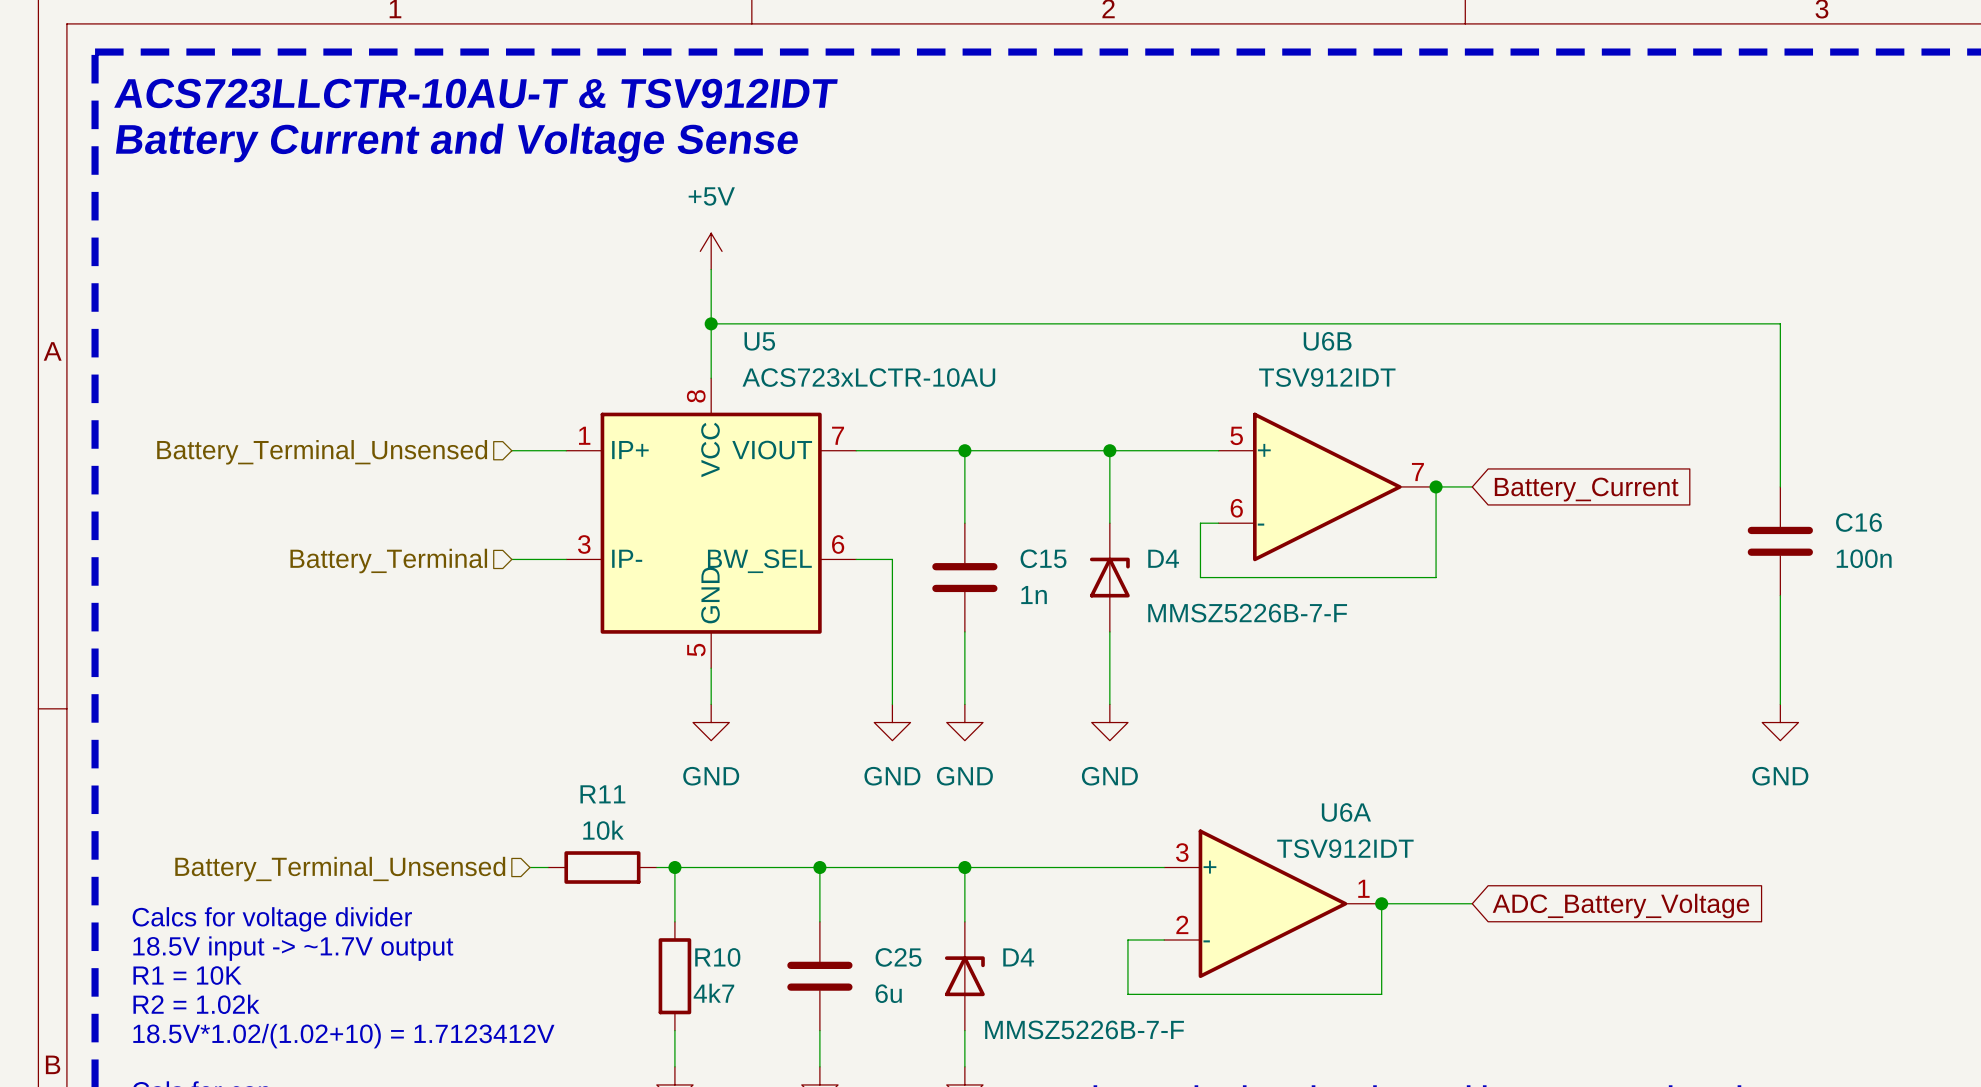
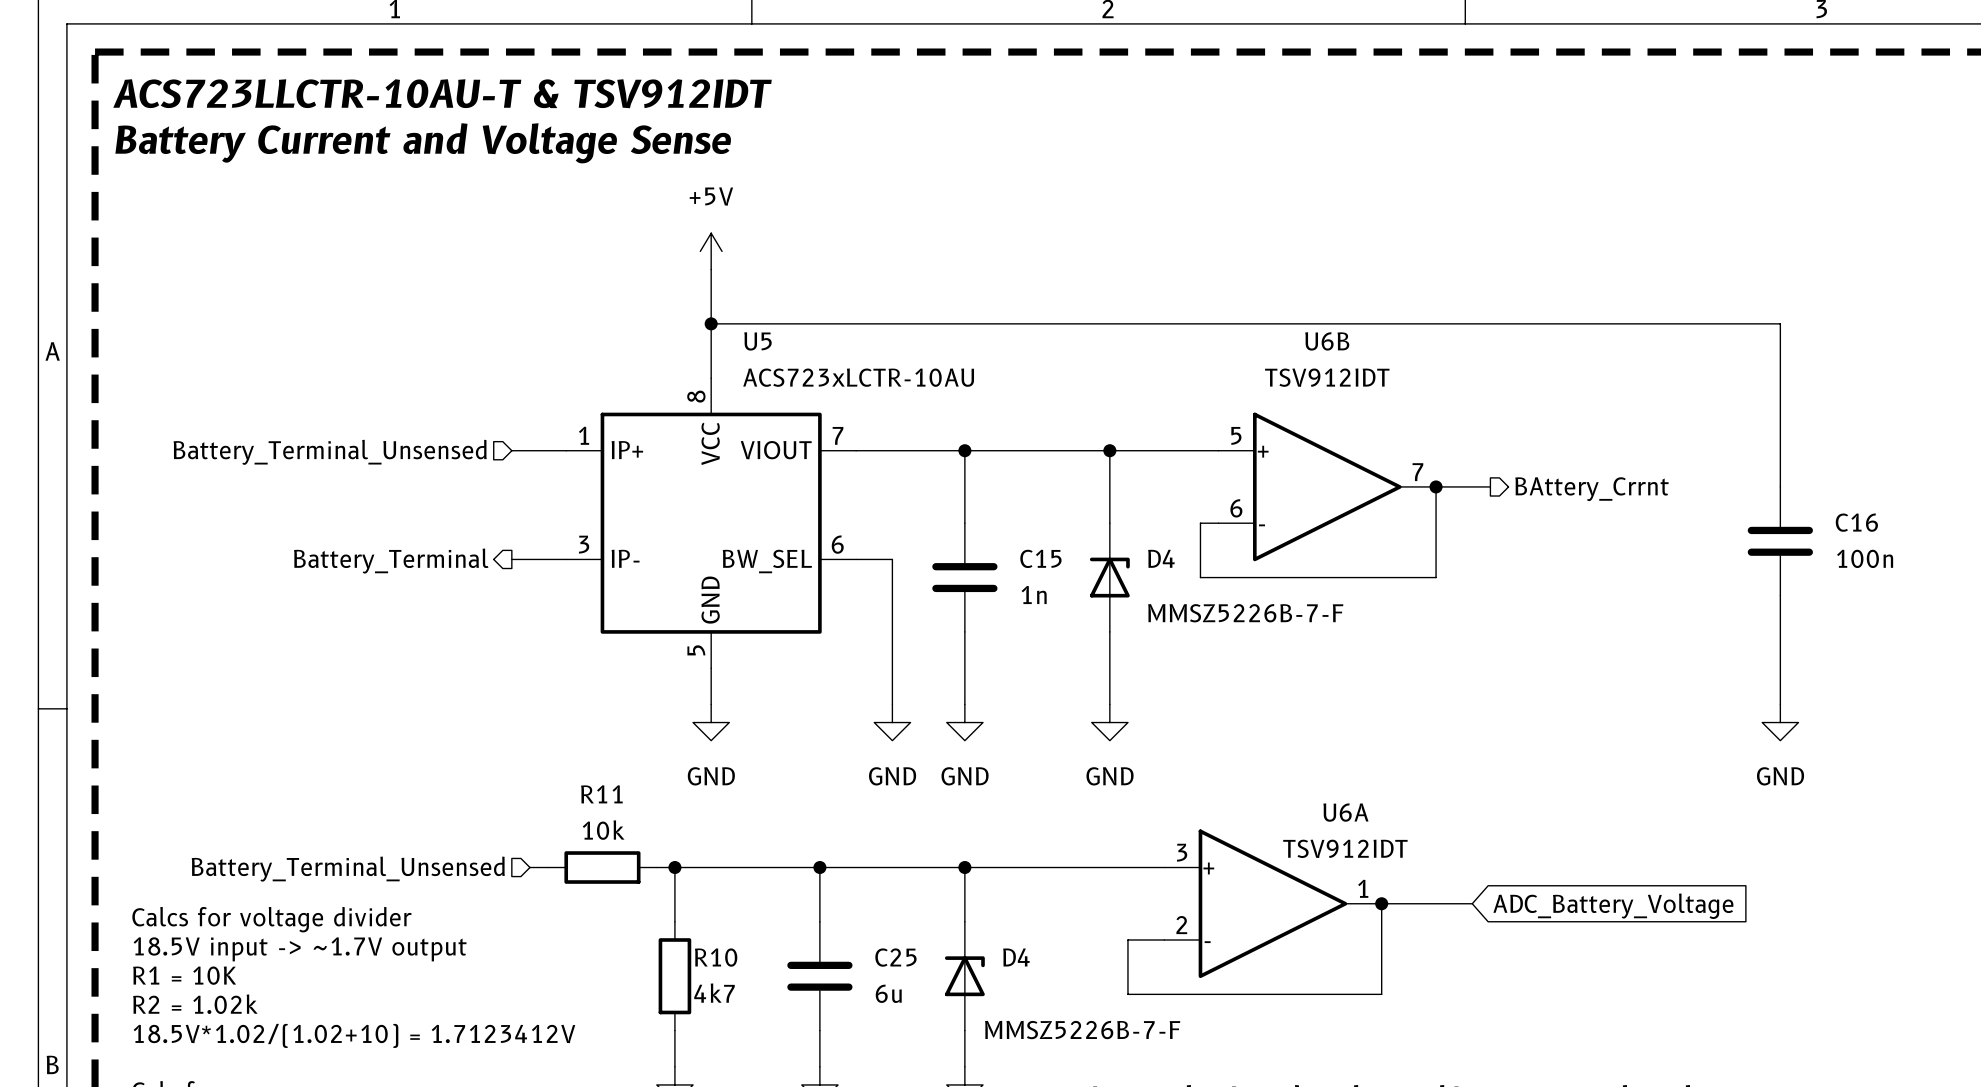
wire: none -> (1472, 486) (1490, 486)
hierarchical label: none -> BAttery_Crrnt (1592, 489)
global label: Battery_Current (1586, 489) -> none
hierarchical label shape: input (388, 561) -> output (391, 561)

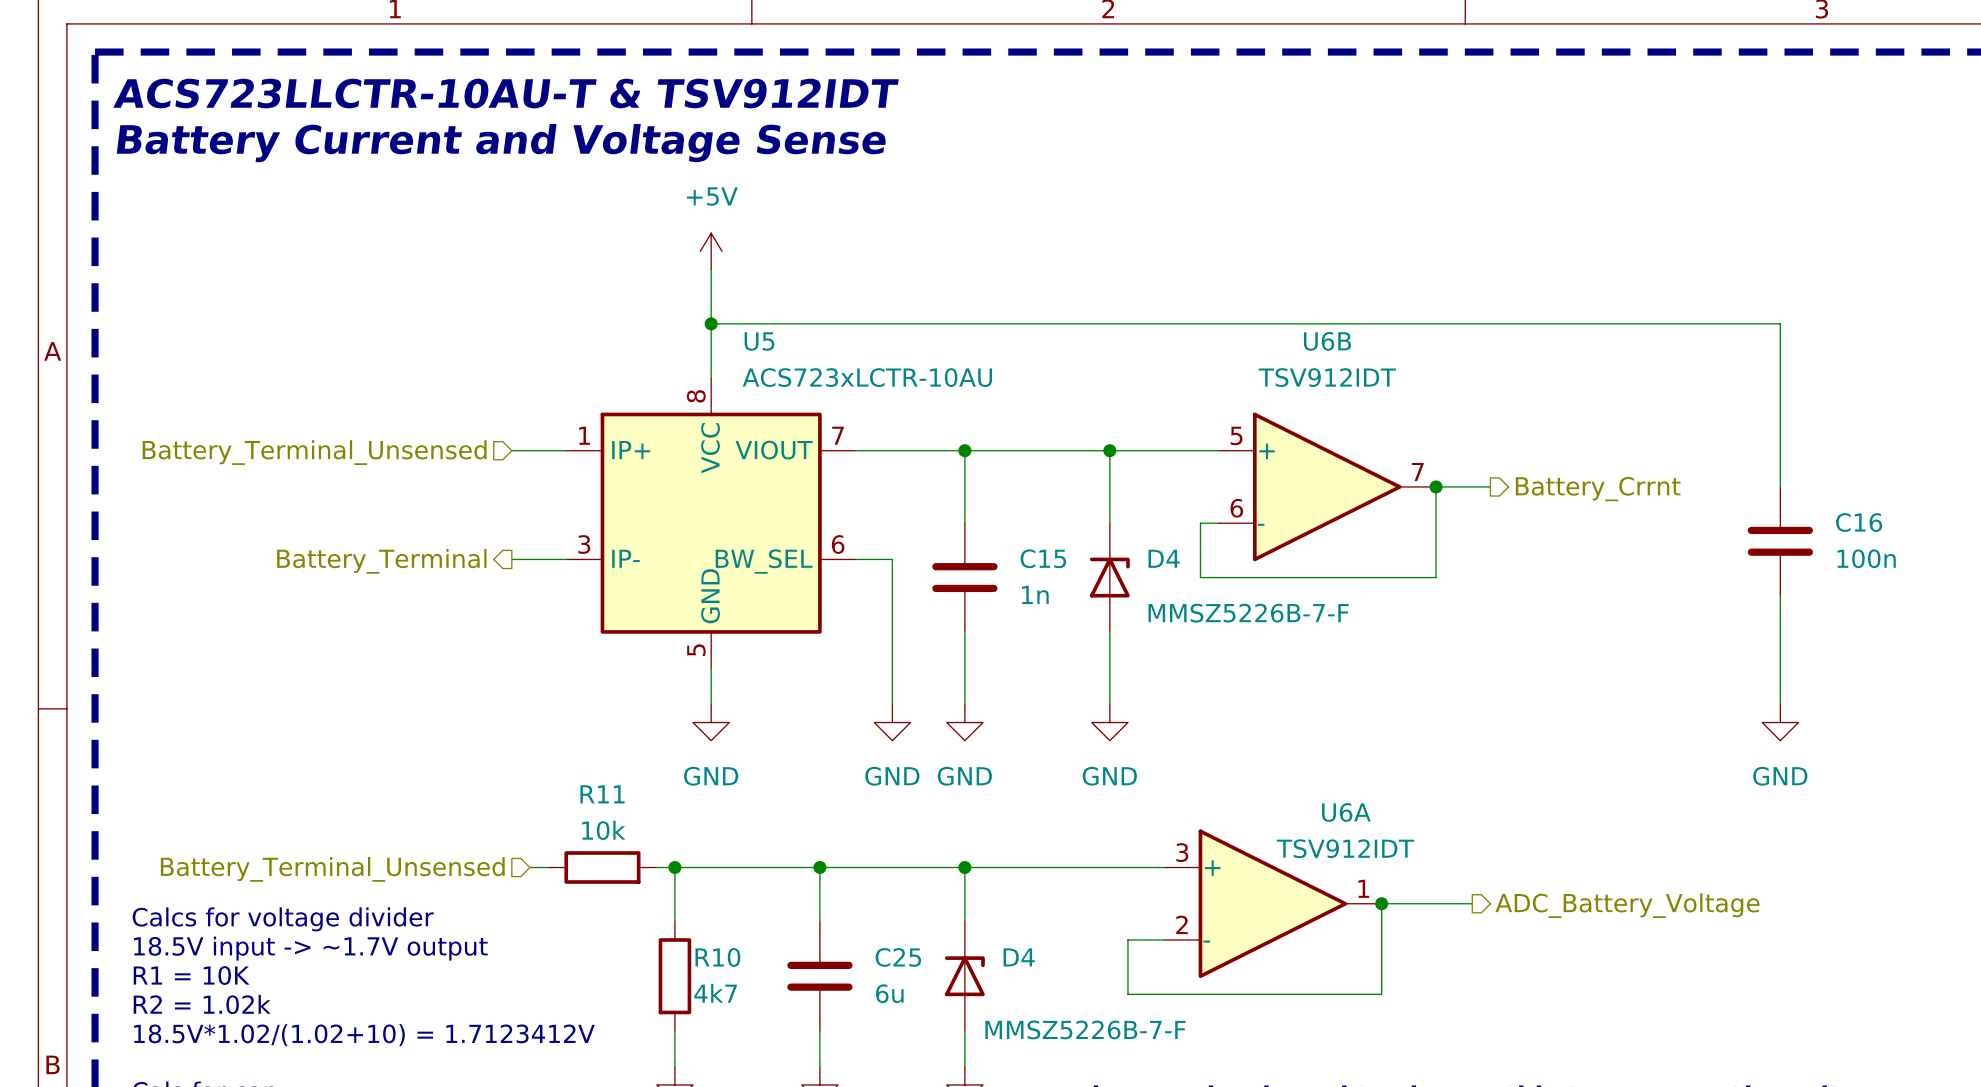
hierarchical label: BAttery_Crrnt (1592, 489) -> Battery_Crrnt (1598, 489)
hierarchical label: none -> ADC_Battery_Voltage (1627, 905)
global label: ADC_Battery_Voltage (1613, 906) -> none

